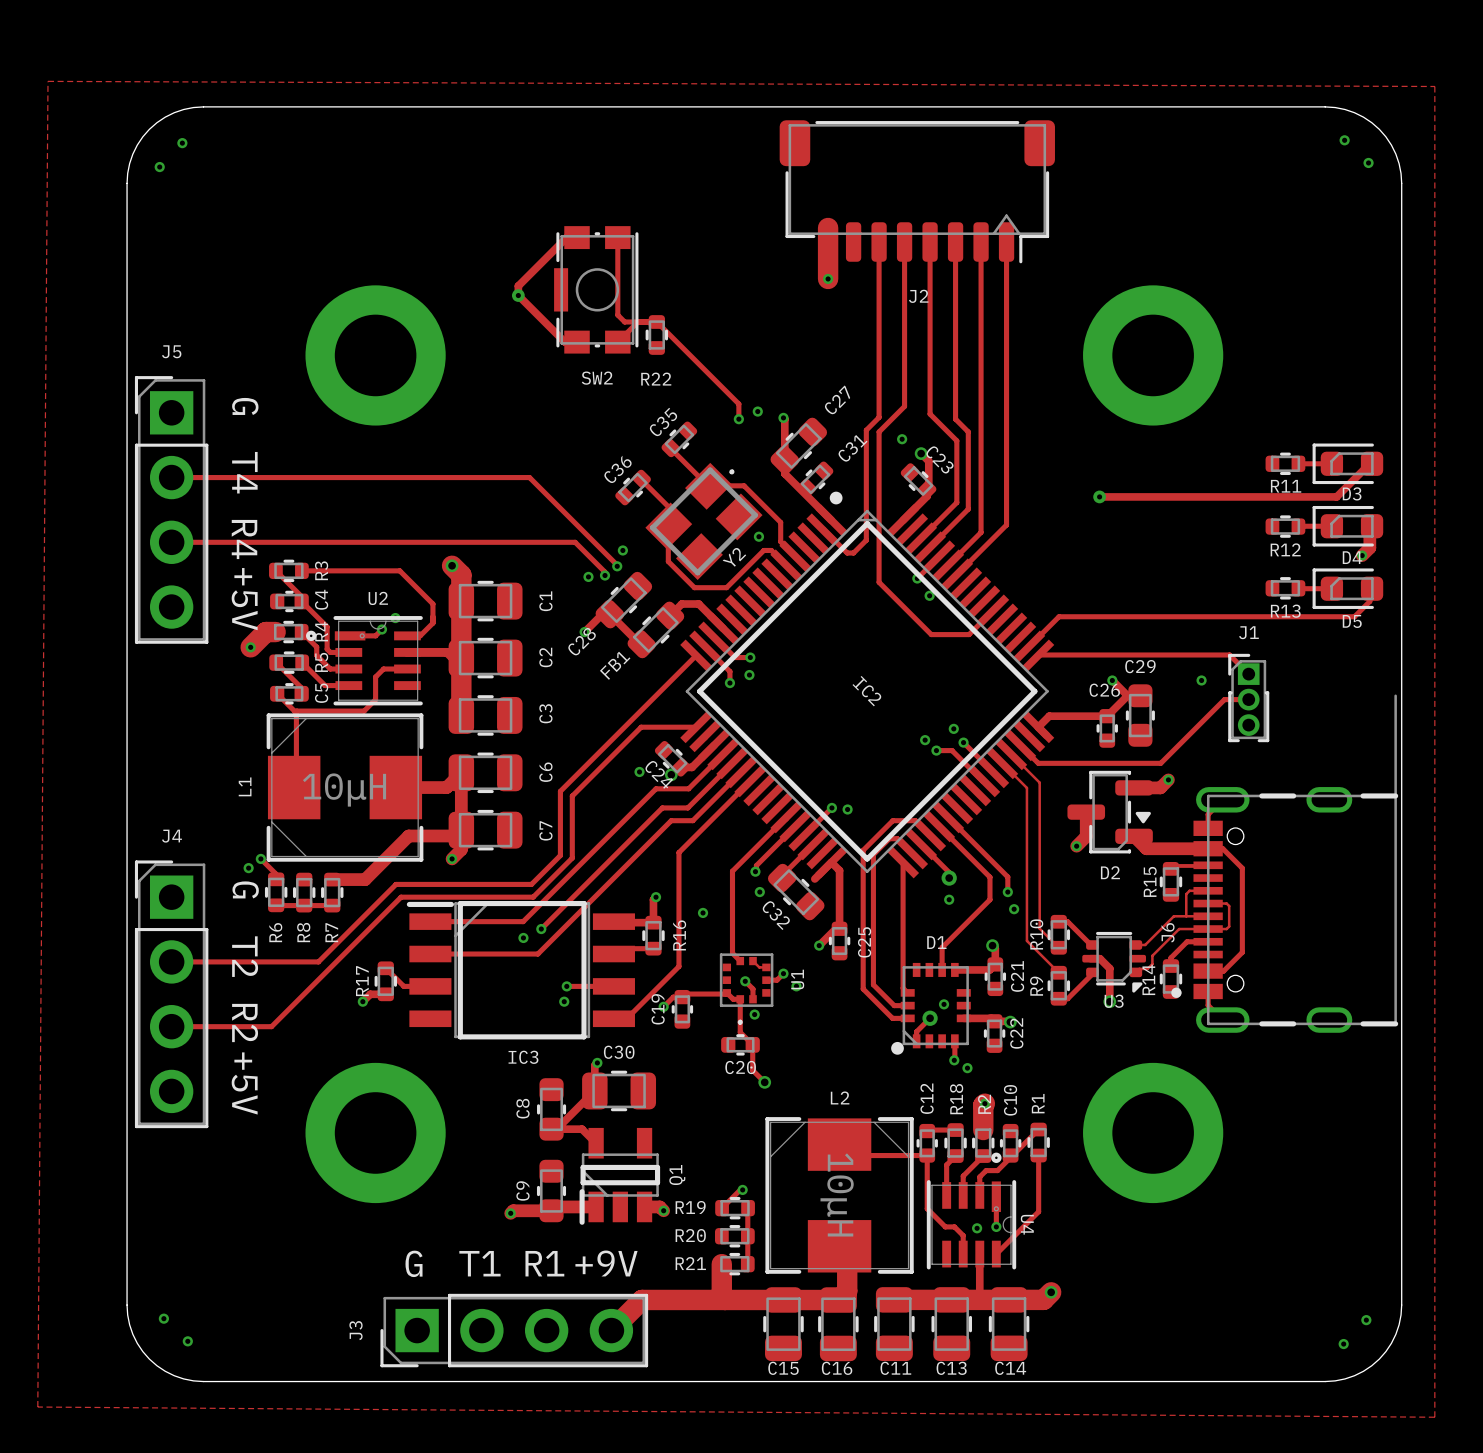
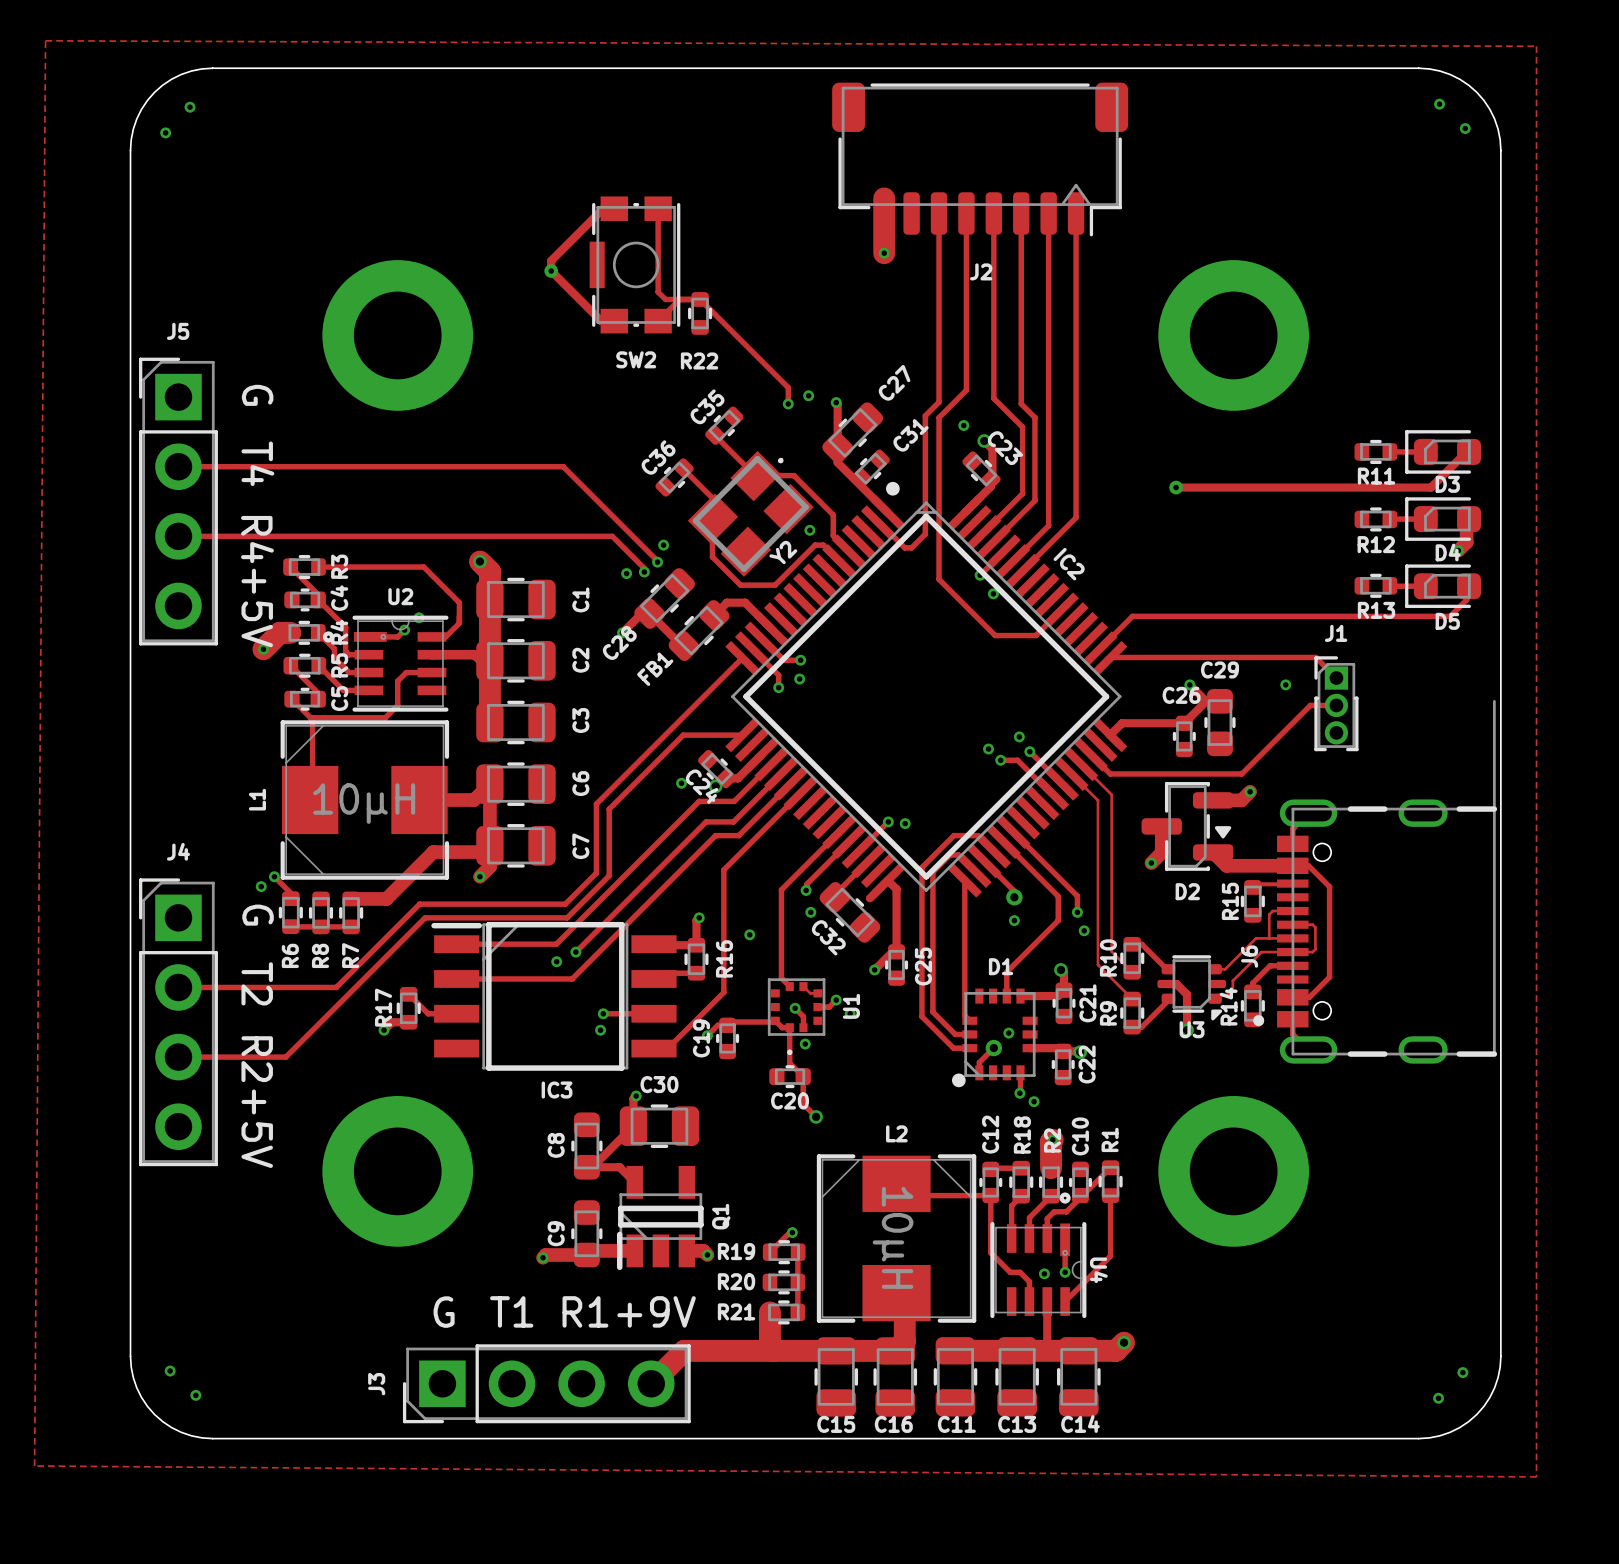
IC2 name position: IC2 (866, 691) -> IC2 (1069, 564)

